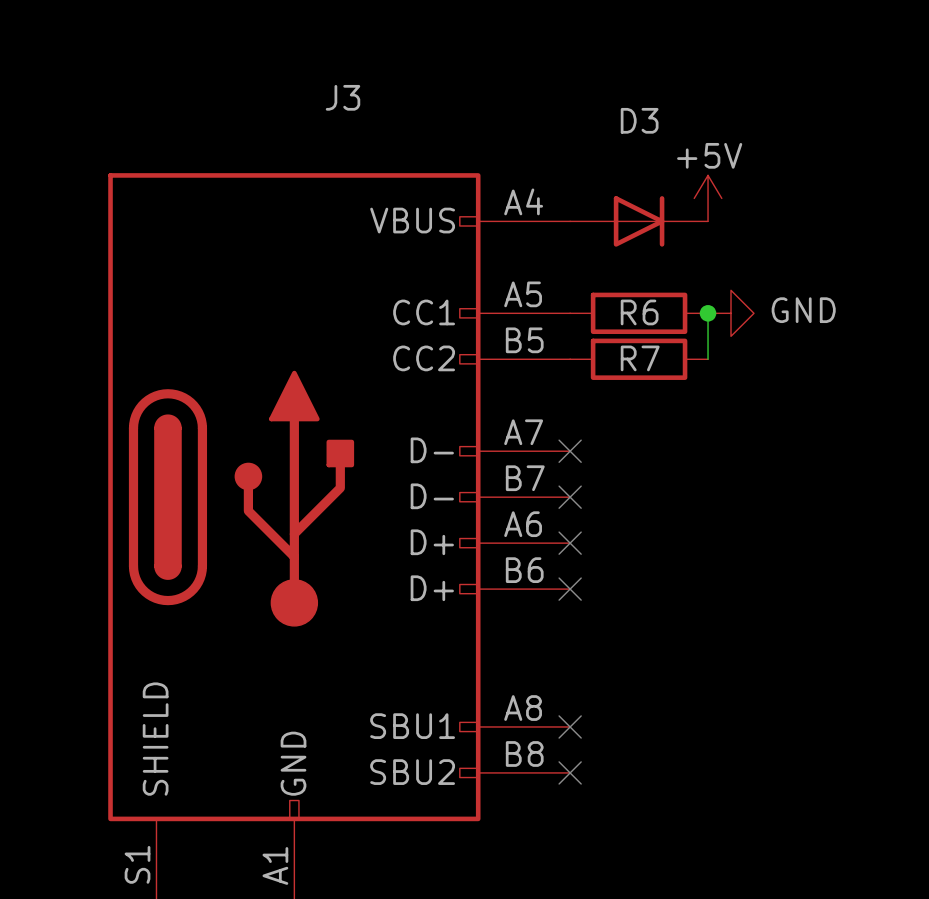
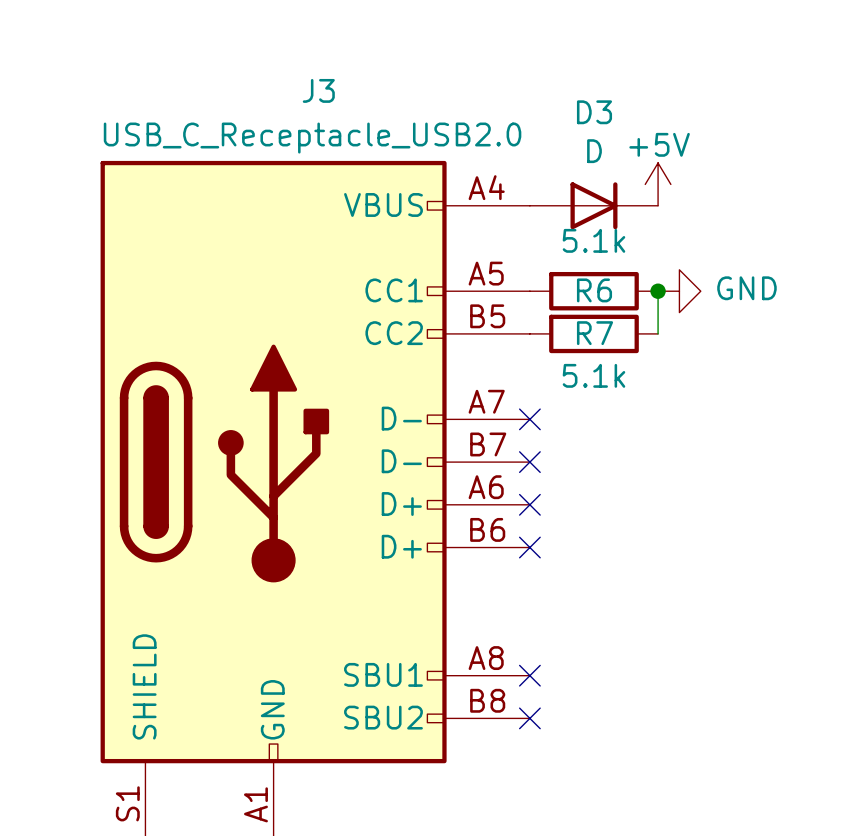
J3 value: none -> USB_C_Receptacle_USB2.0 (312, 138)
D3 value: none -> D (594, 151)
R6 value: none -> 5.1k (593, 240)
R7 value: none -> 5.1k (593, 375)

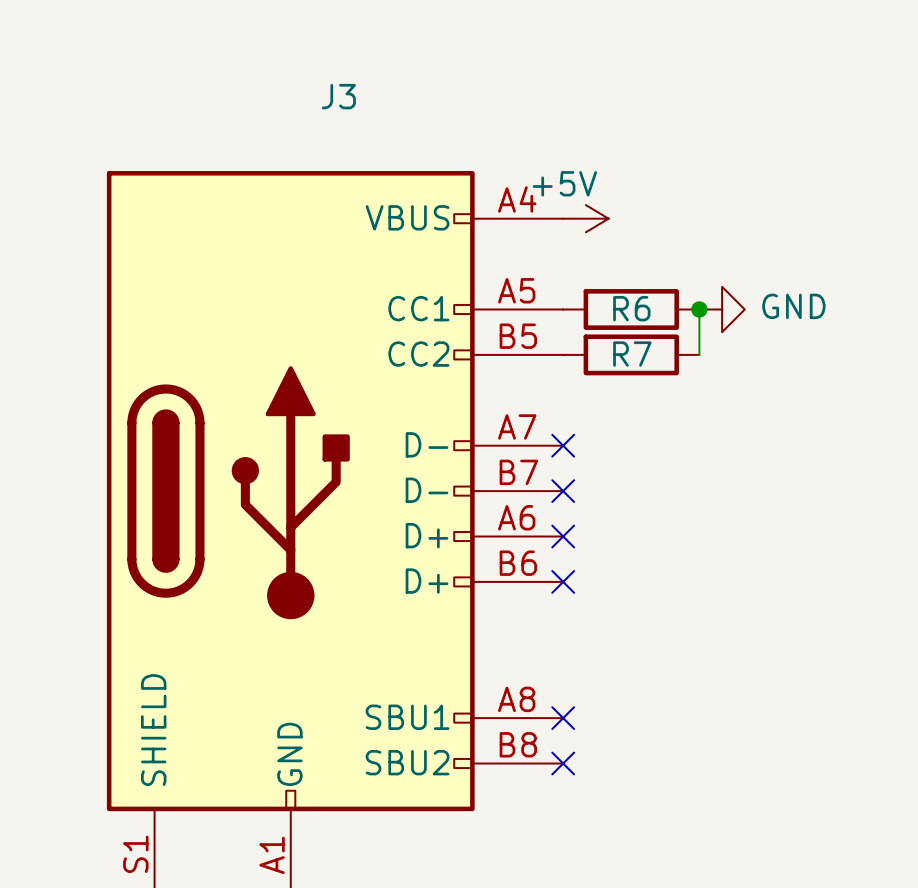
J3 value: USB_C_Receptacle_USB2.0 (312, 138) -> none
power symbol rotation: 0° (658, 184) -> 90° clockwise (585, 218)
power symbol position: +5V (658, 184) -> +5V (585, 218)
D3: D (593, 205) -> none
R6 value: 5.1k (593, 240) -> none
R7 value: 5.1k (593, 375) -> none

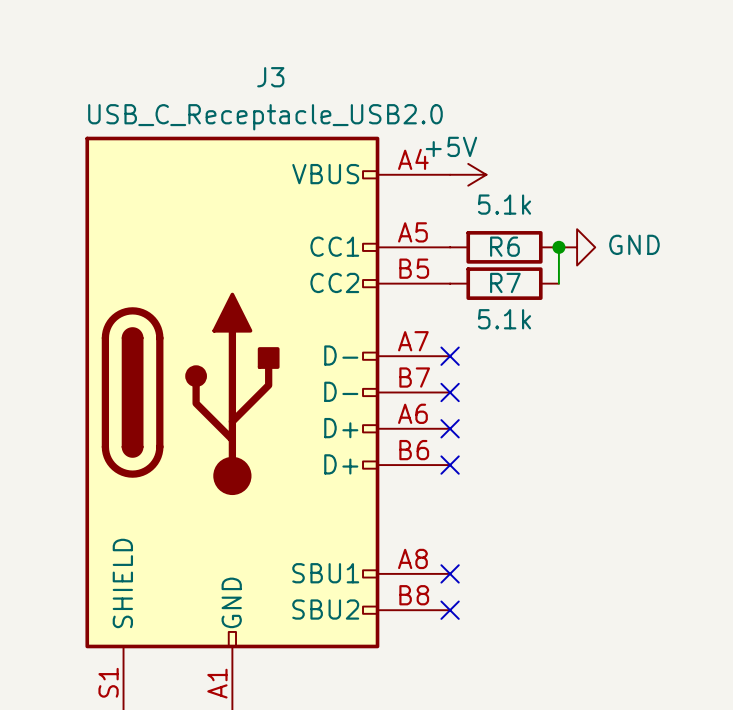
J3 value: none -> USB_C_Receptacle_USB2.0 (265, 117)
R6 value: none -> 5.1k (504, 204)
R7 value: none -> 5.1k (504, 319)

